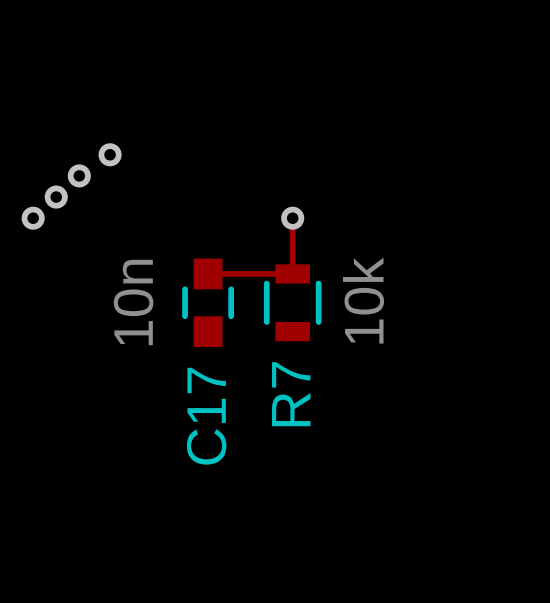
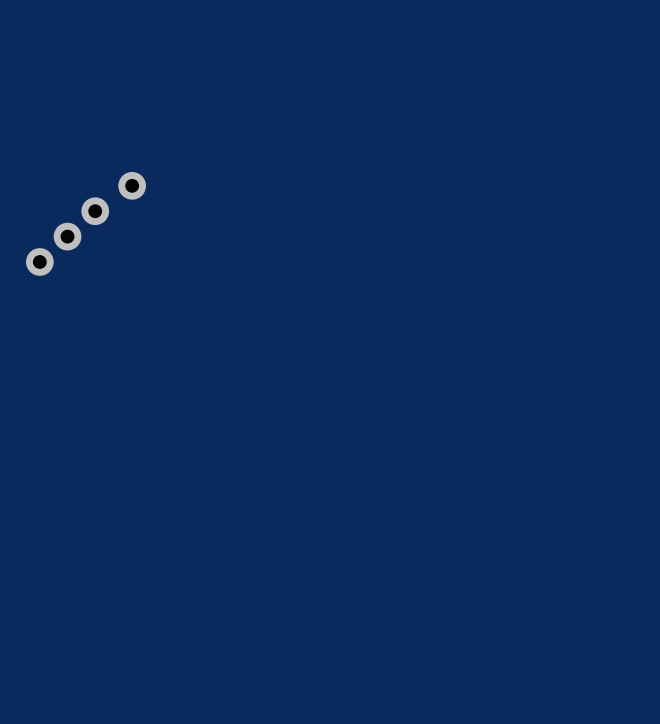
track: (292, 218) (292, 273) (208, 273) -> none
via: (292, 218) -> none
C17: 10n (208, 302) -> none
R7: 10k (292, 302) -> none

